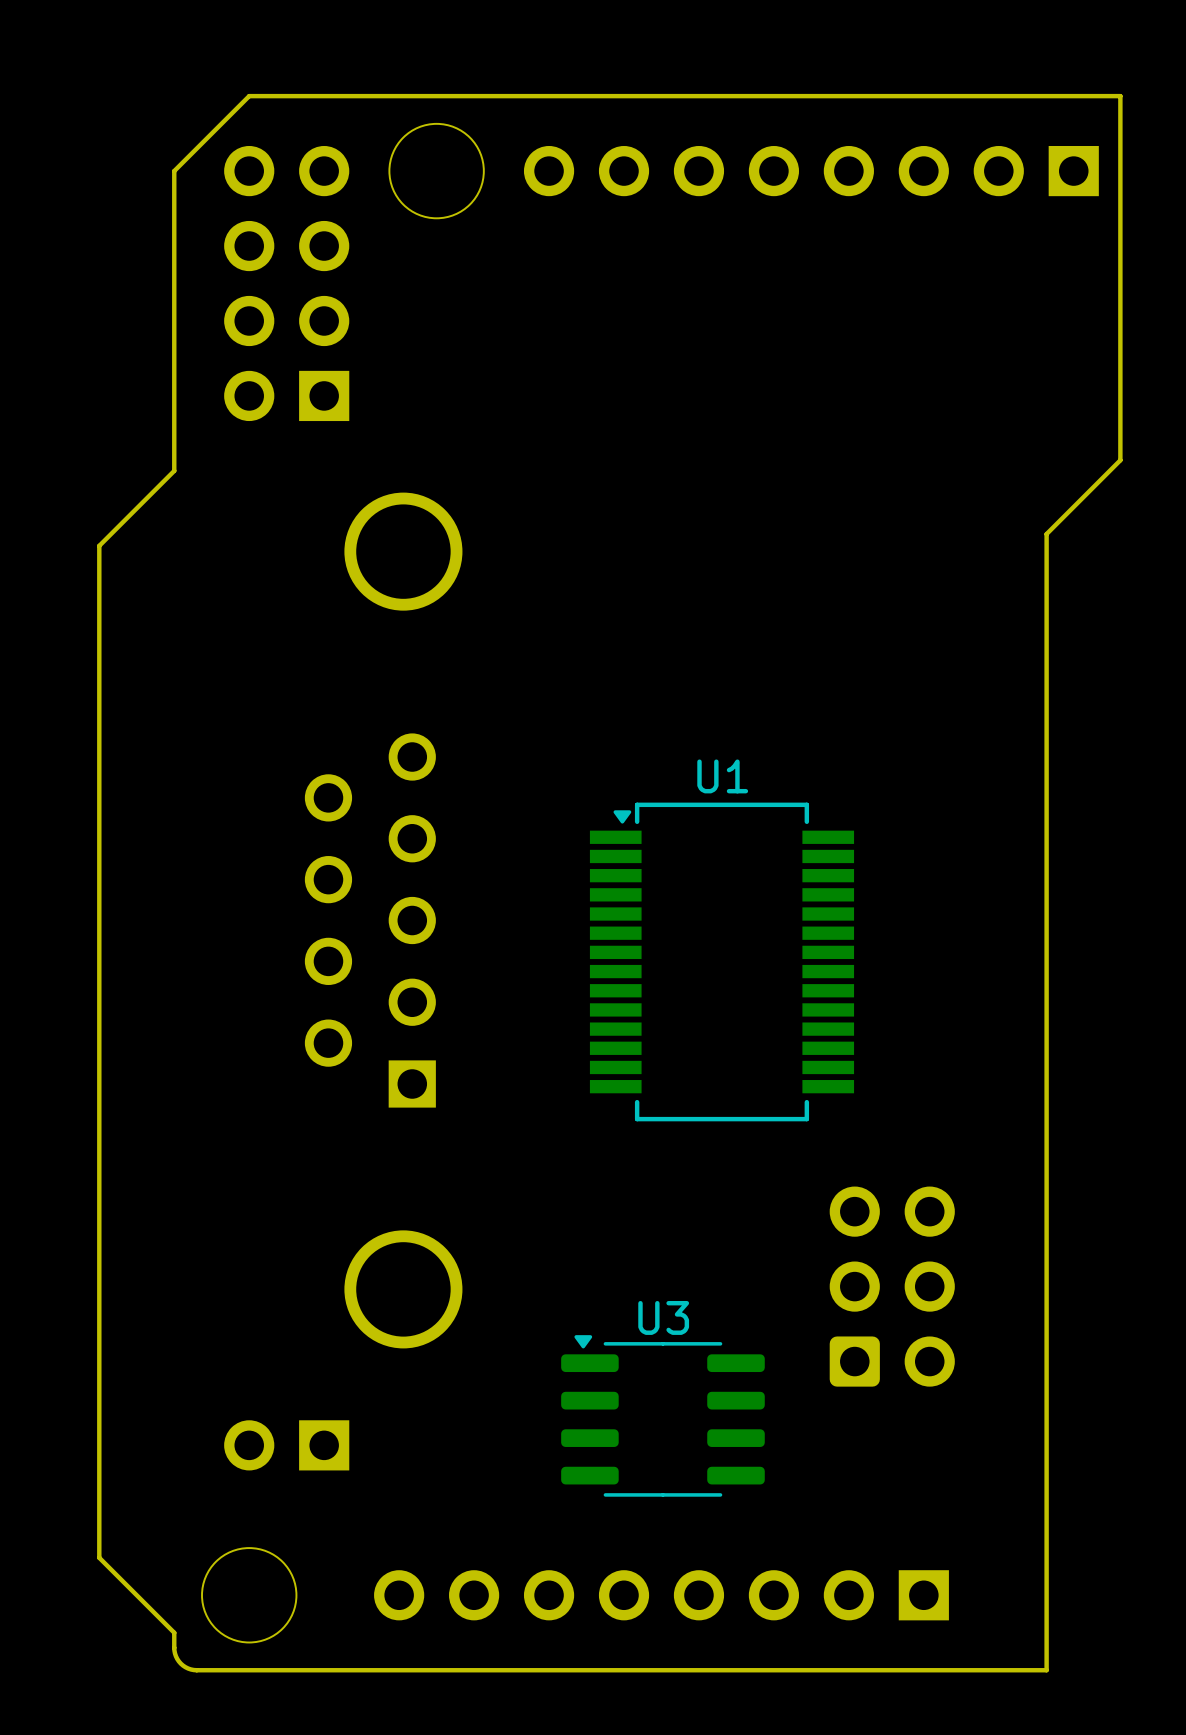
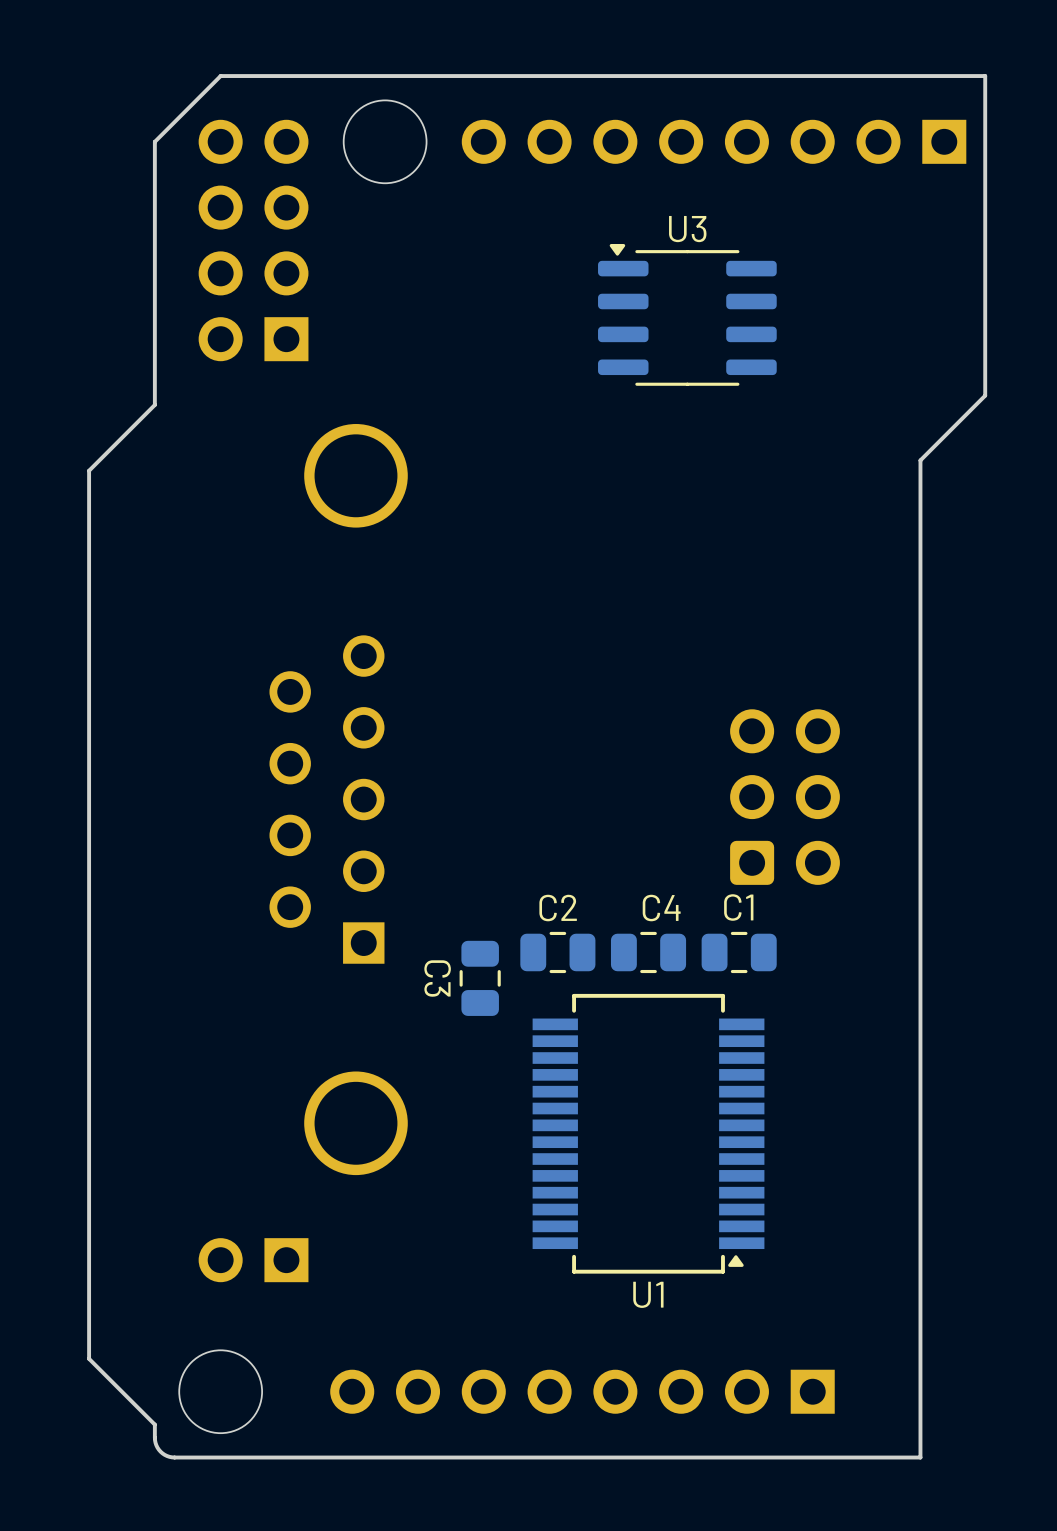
U1 rotation: 0° (721, 961) -> 180° (648, 1133)
U1 position: (721, 961) -> (648, 1133)
C2: none -> (557, 952)
C4: none -> (648, 952)
C1: none -> (739, 952)
C3: none -> (480, 978)
part position: (892, 1286) -> (785, 797)
U3 position: (662, 1415) -> (687, 314)

